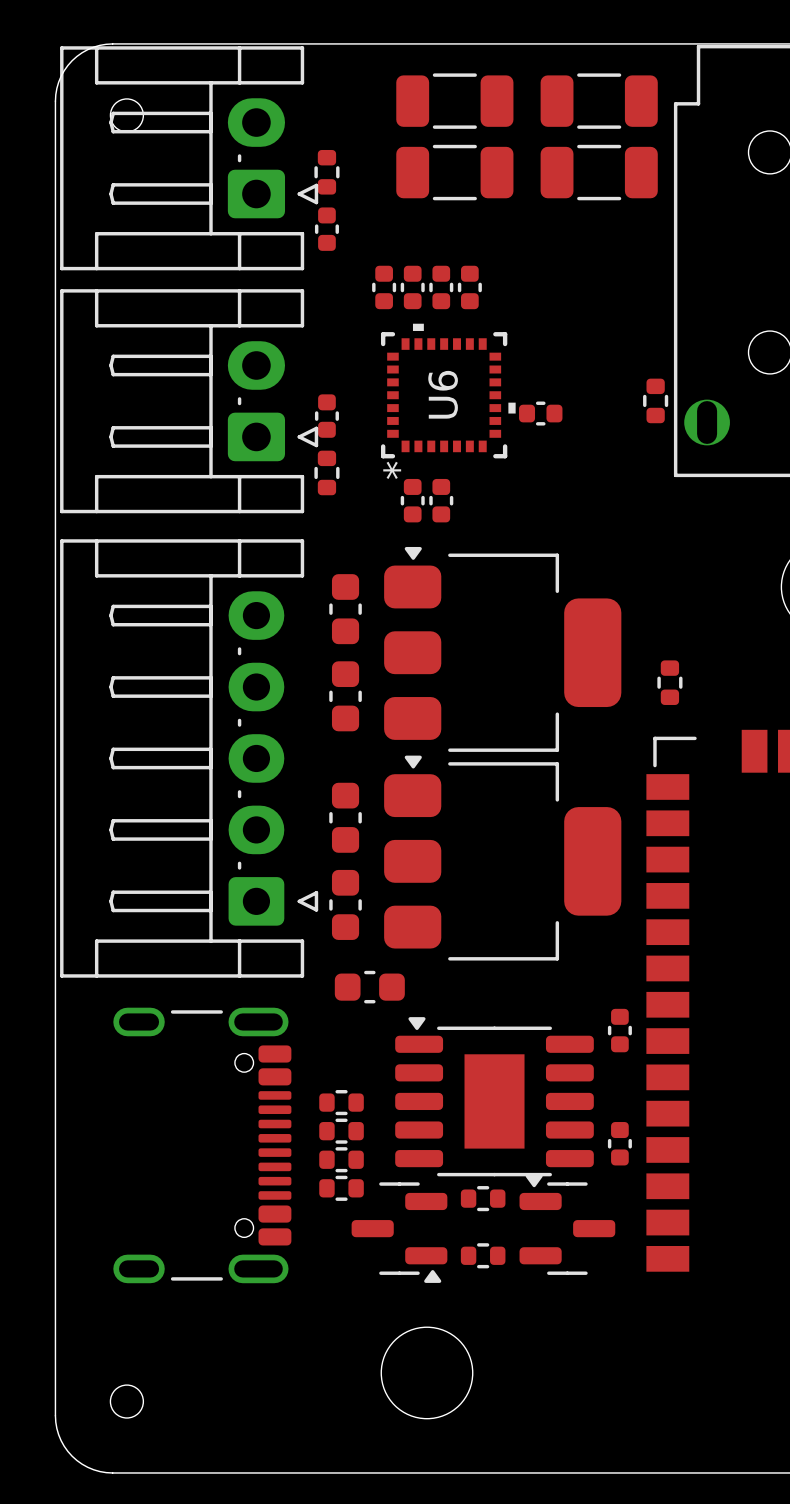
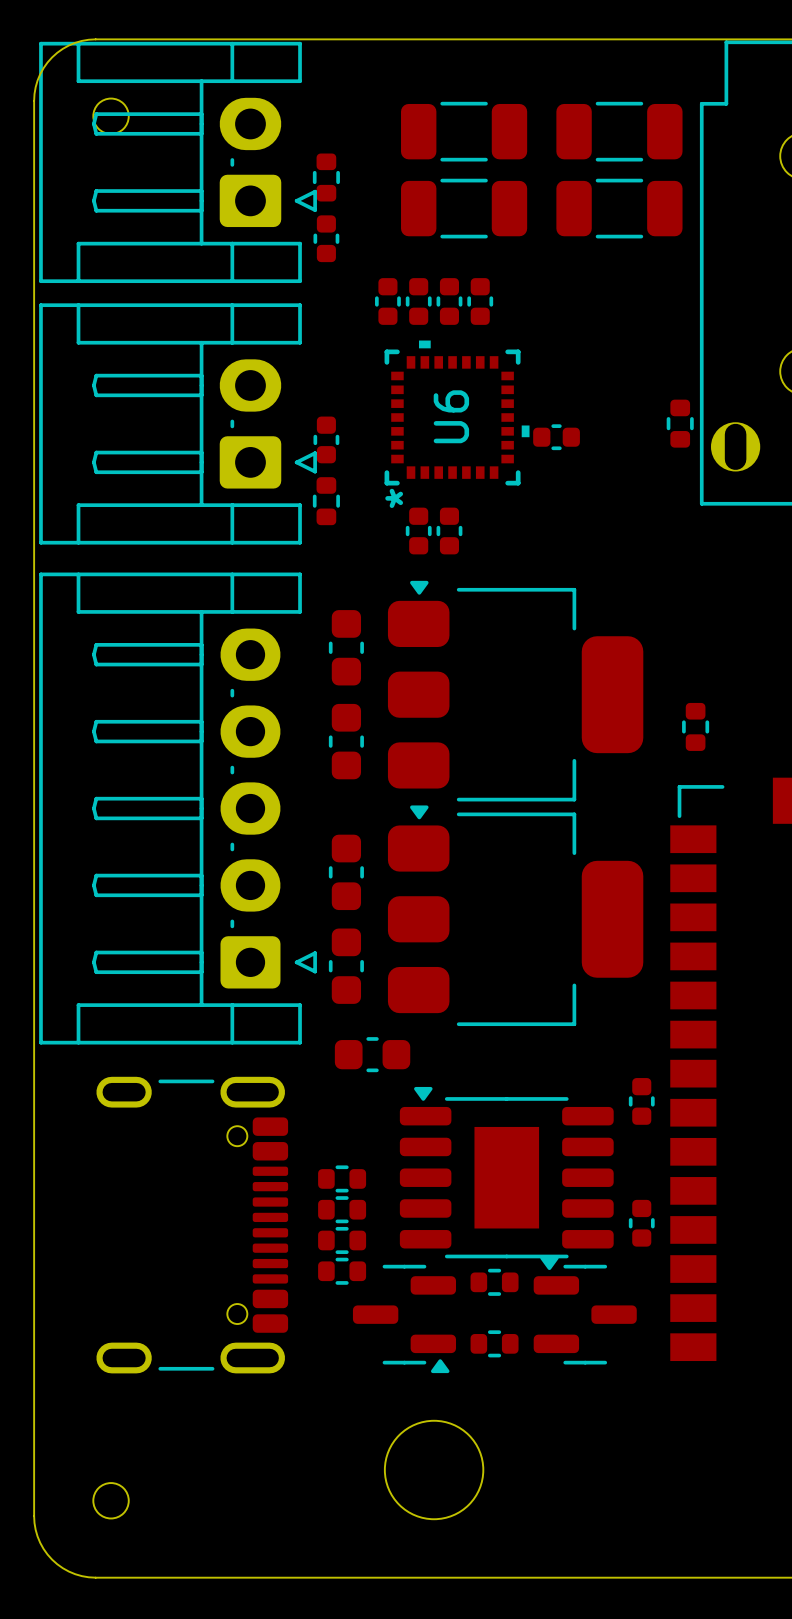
part: (454, 101) -> none
part: (599, 101) -> none
part: none -> (464, 131)
part: none -> (619, 131)
part: (454, 172) -> none
part: (599, 172) -> none
part: none -> (464, 208)
part: none -> (619, 208)

